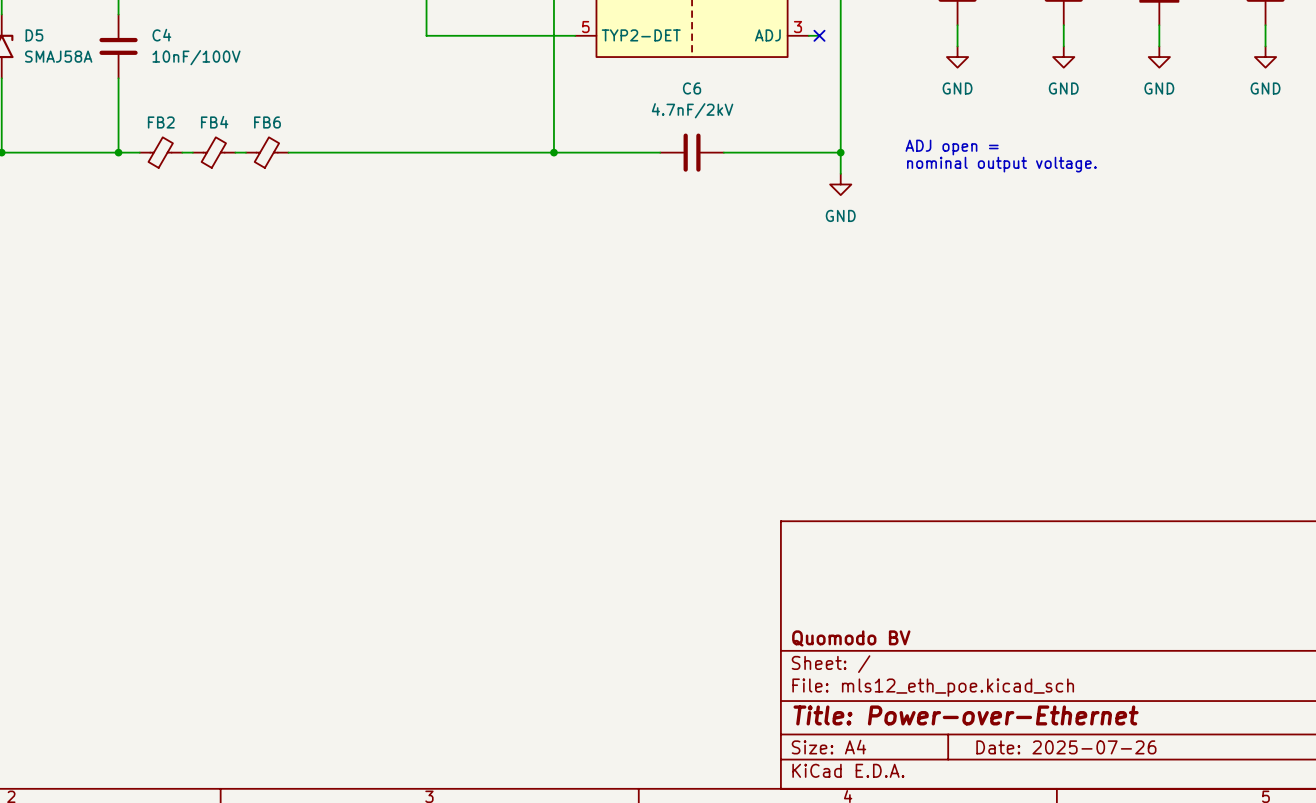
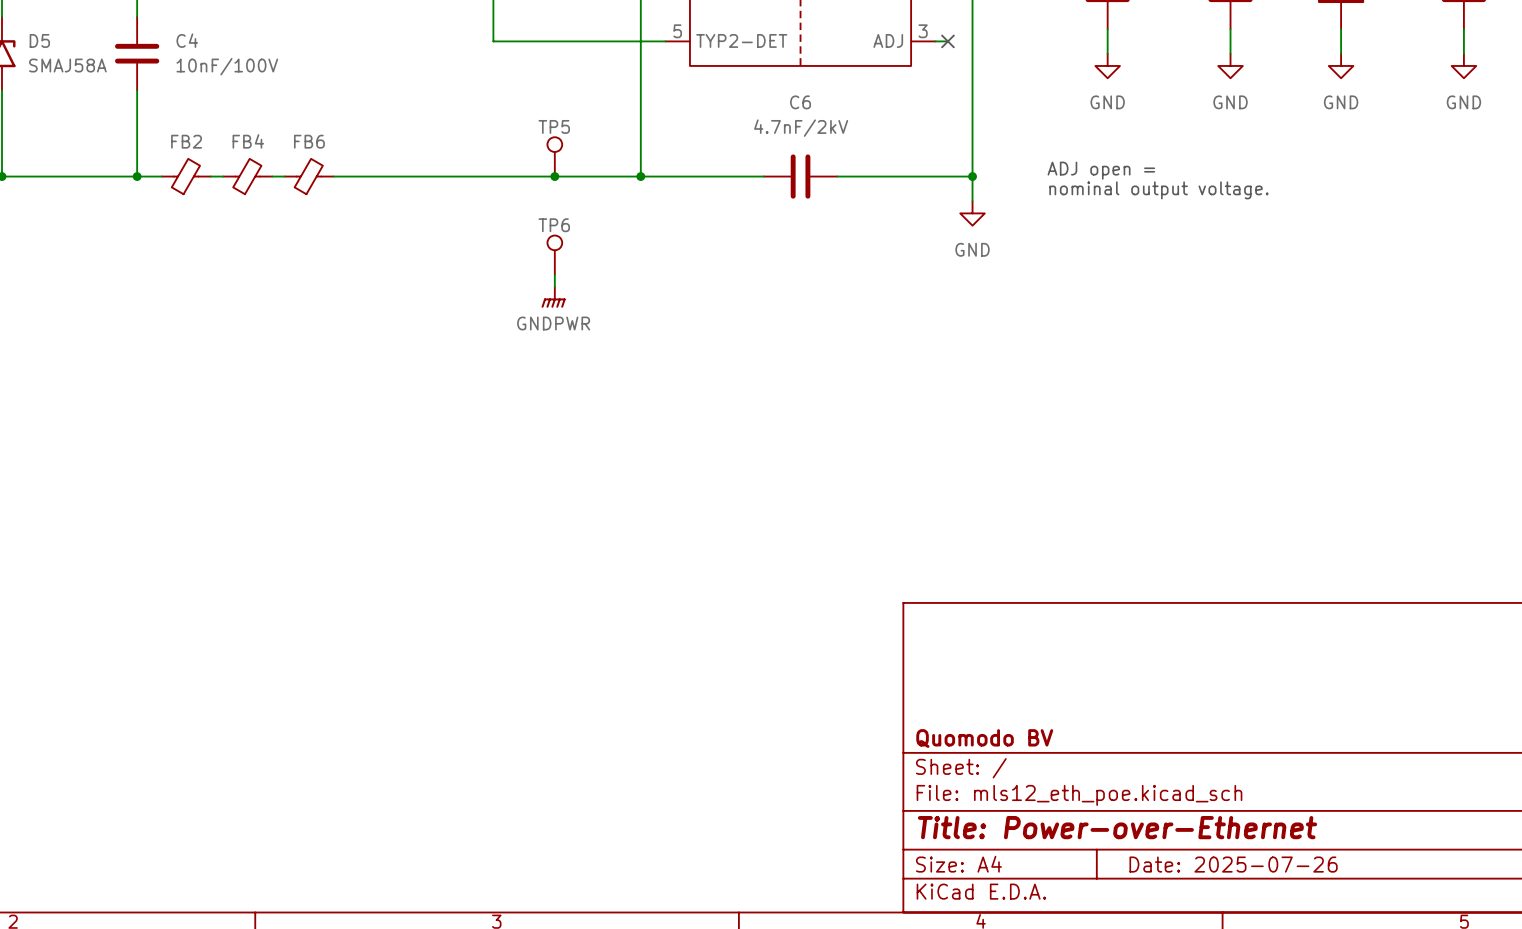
TP5: none -> (554, 156)
junction: none -> (554, 176)
TP6: none -> (554, 255)
wire: none -> (554, 274) (554, 287)
power symbol: none -> GNDPWR (553, 297)

